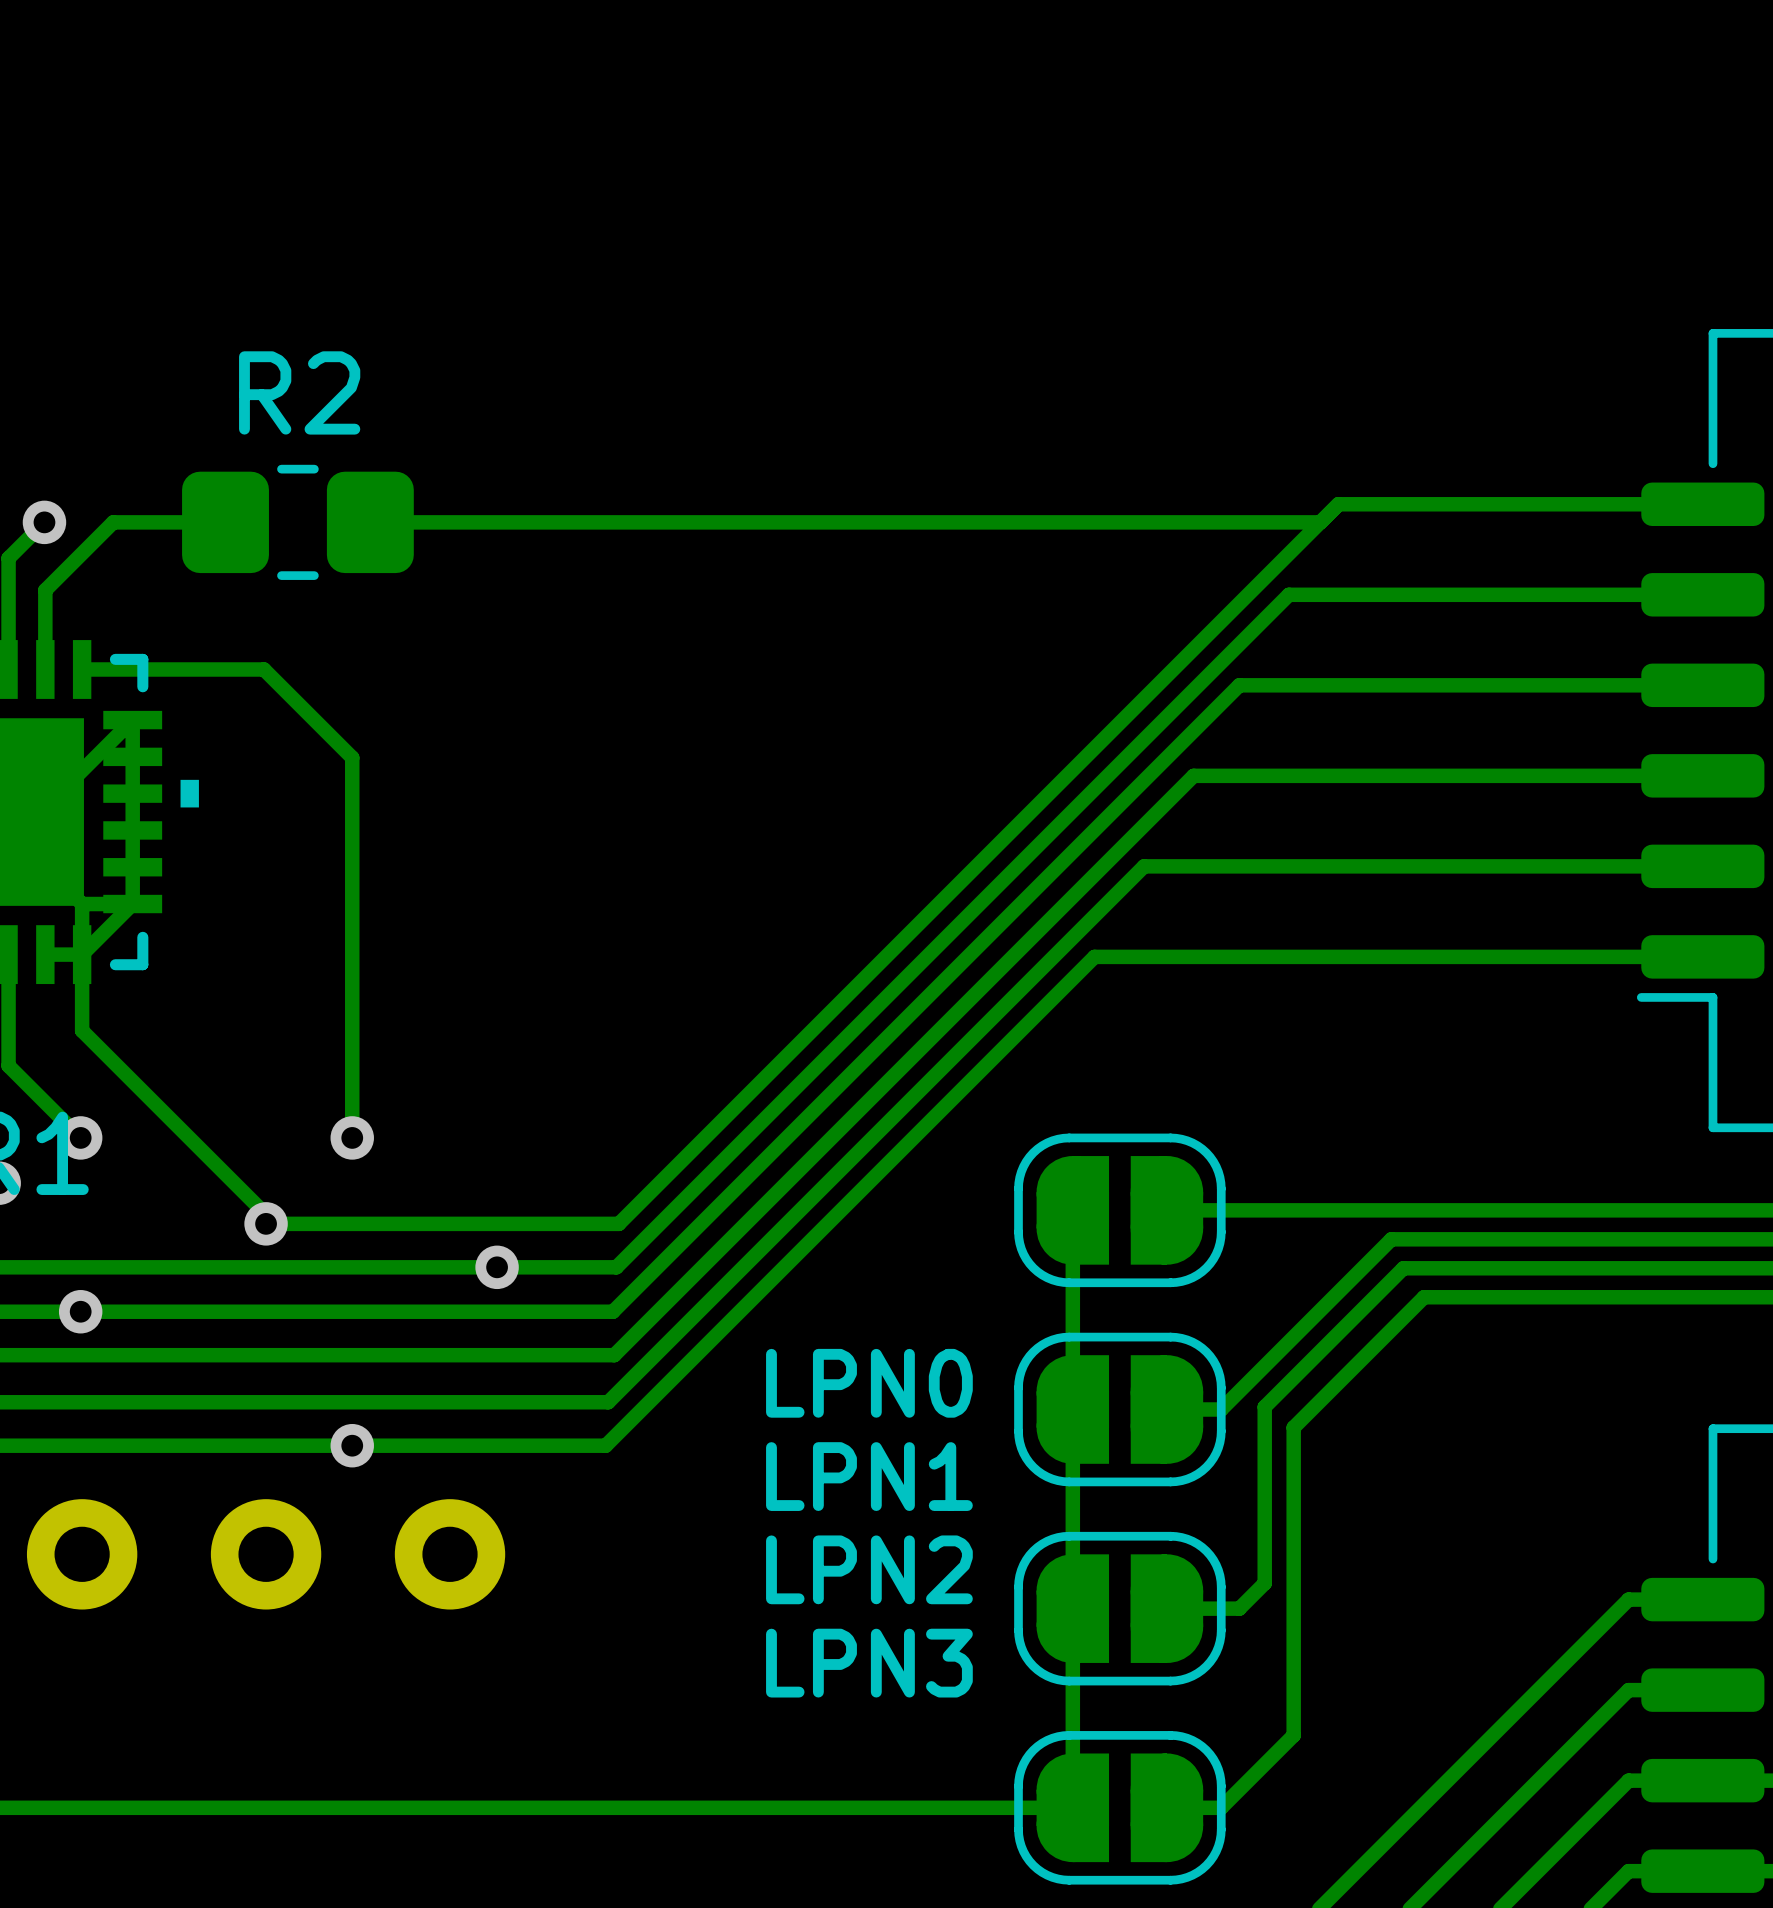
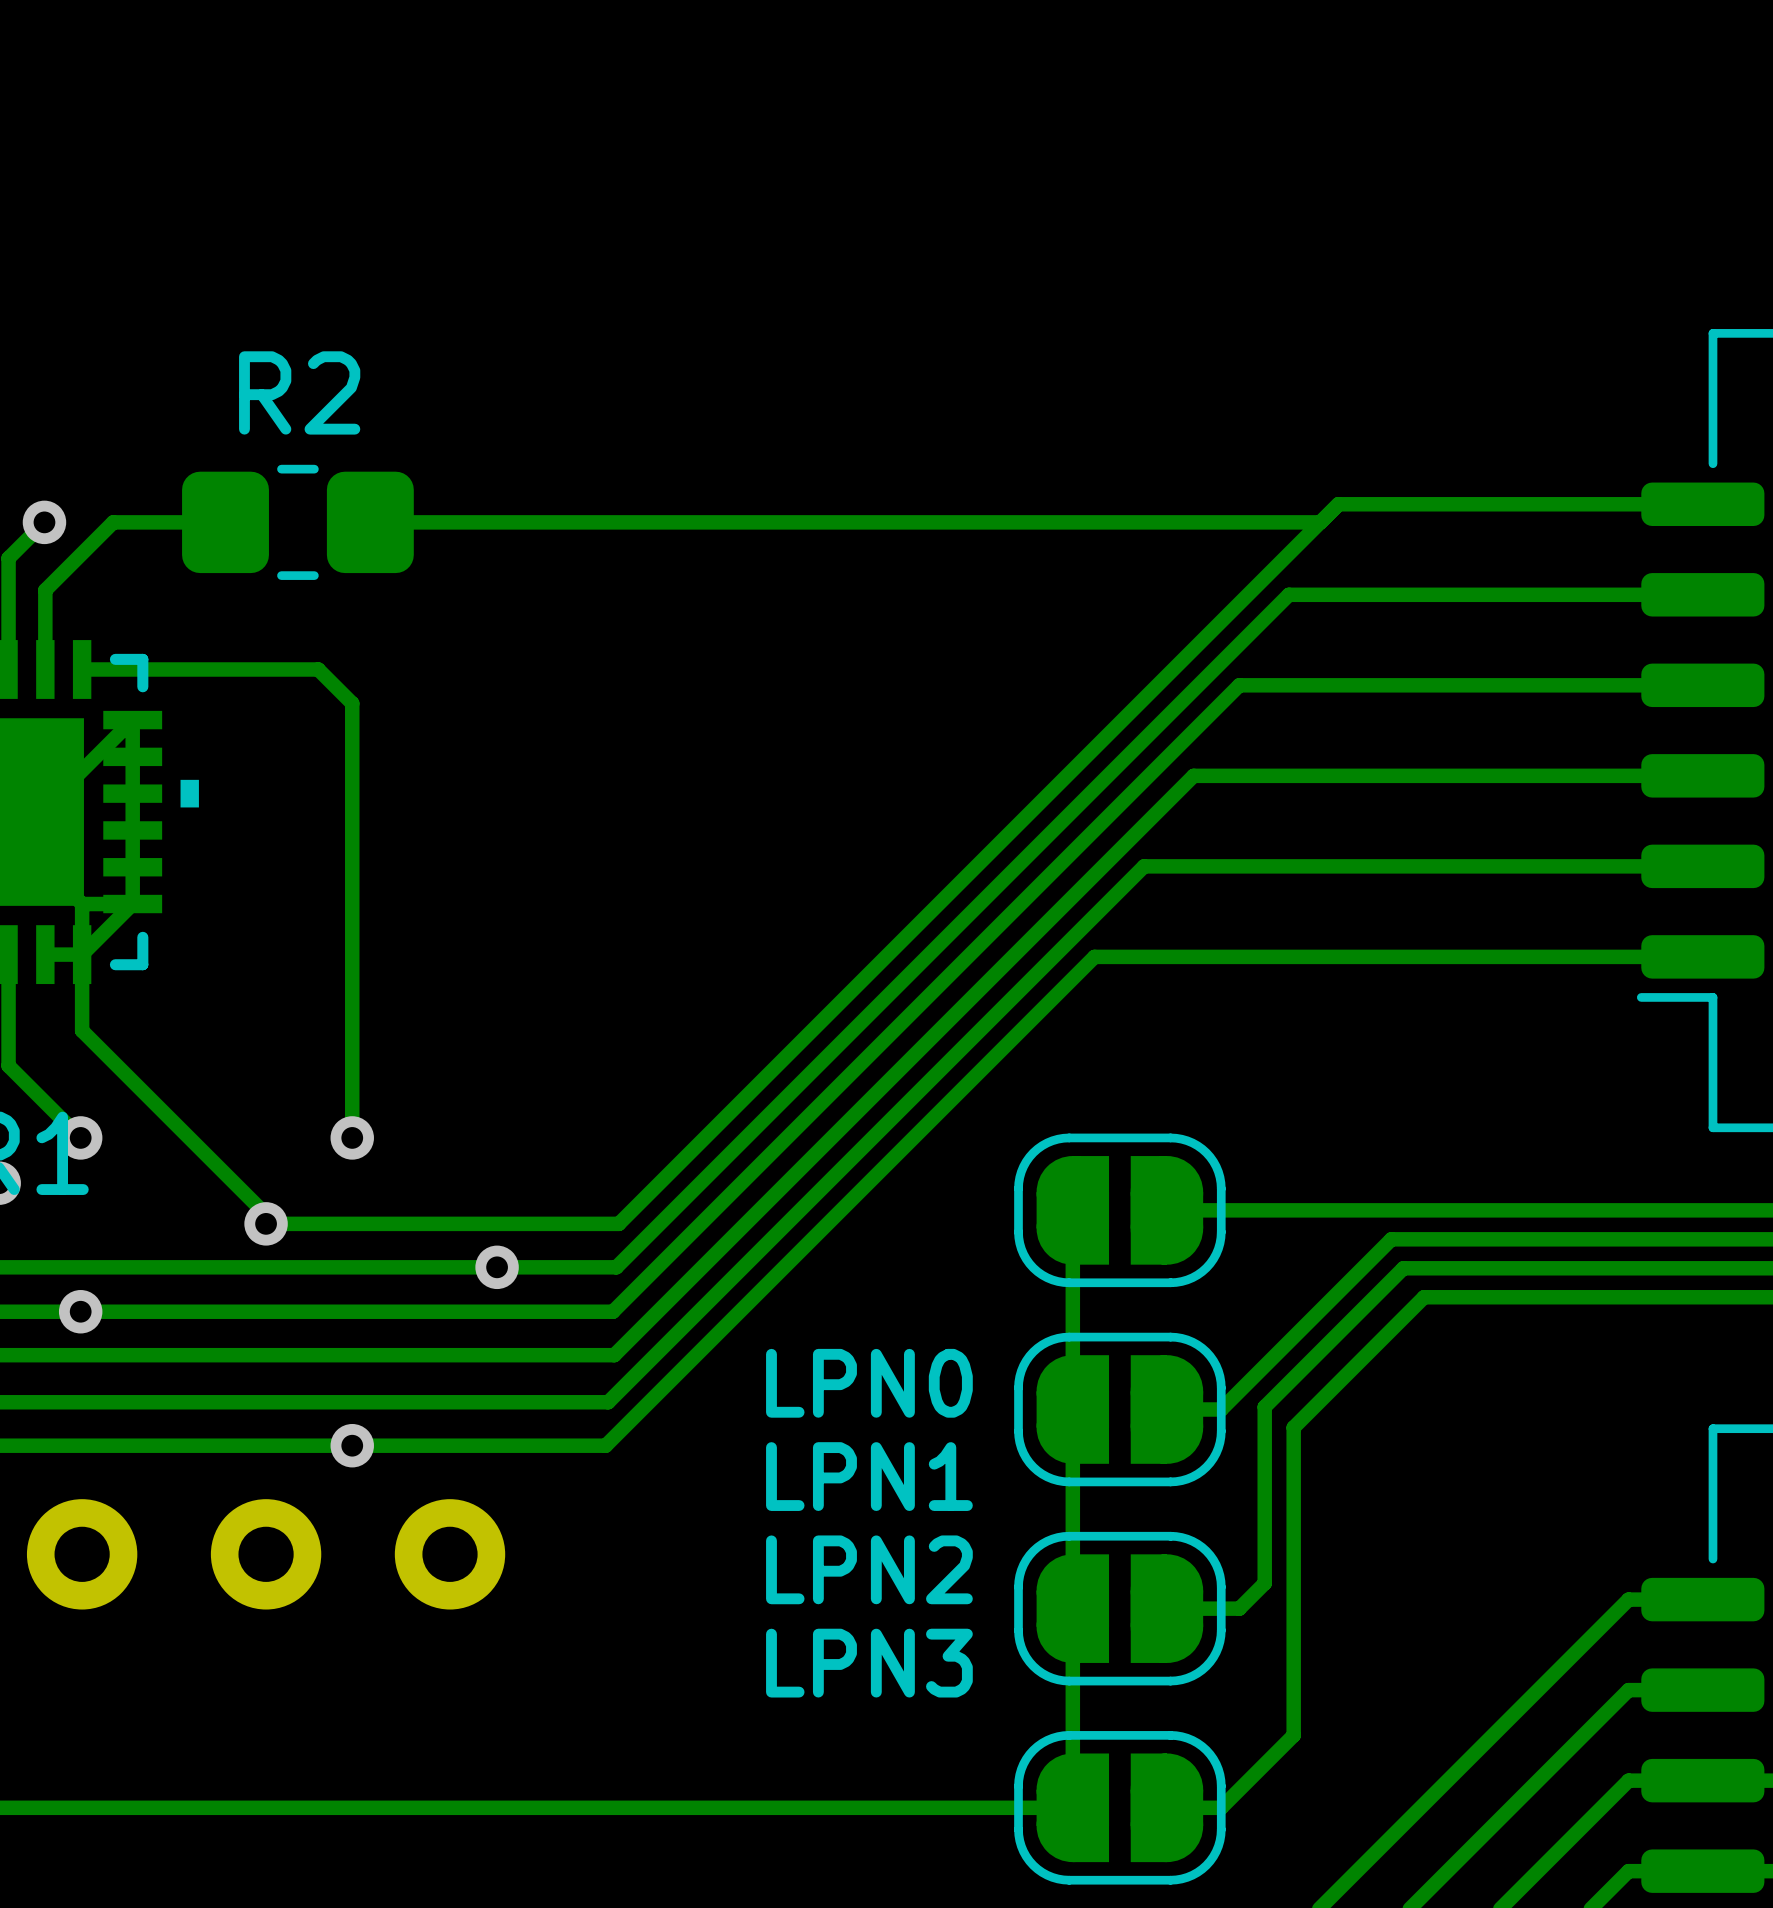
track: (264, 669) (352, 757) -> (264, 669) (318, 669) (352, 703) (352, 757)

